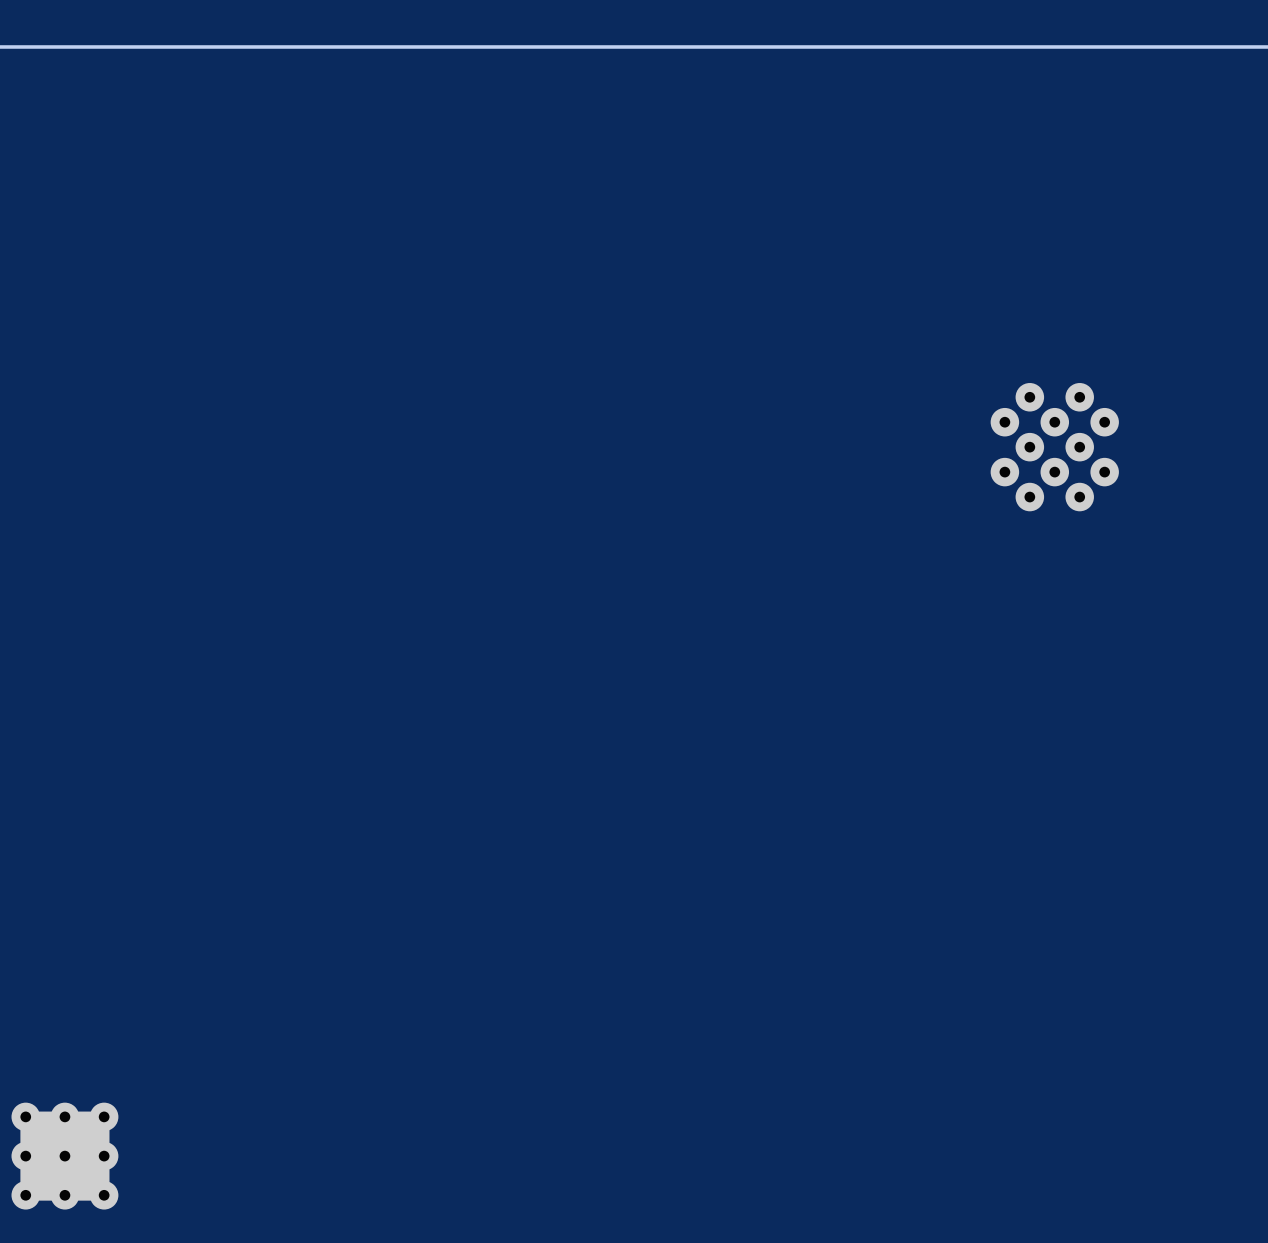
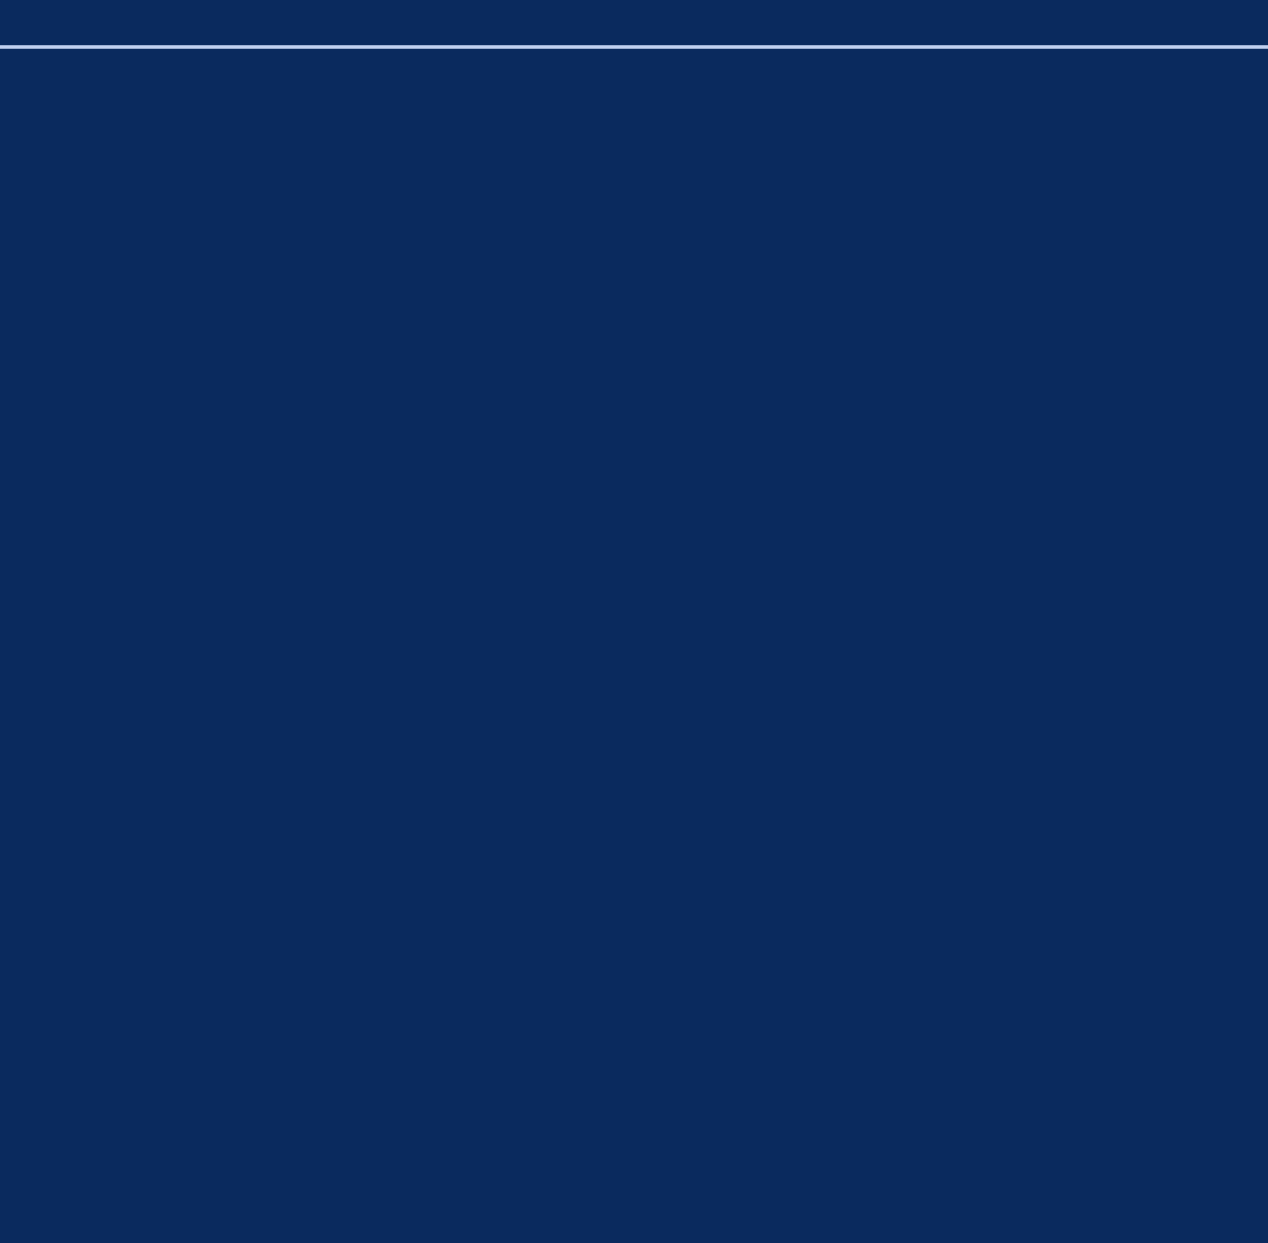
part: (1054, 447) -> none
part: (64, 1156) -> none

